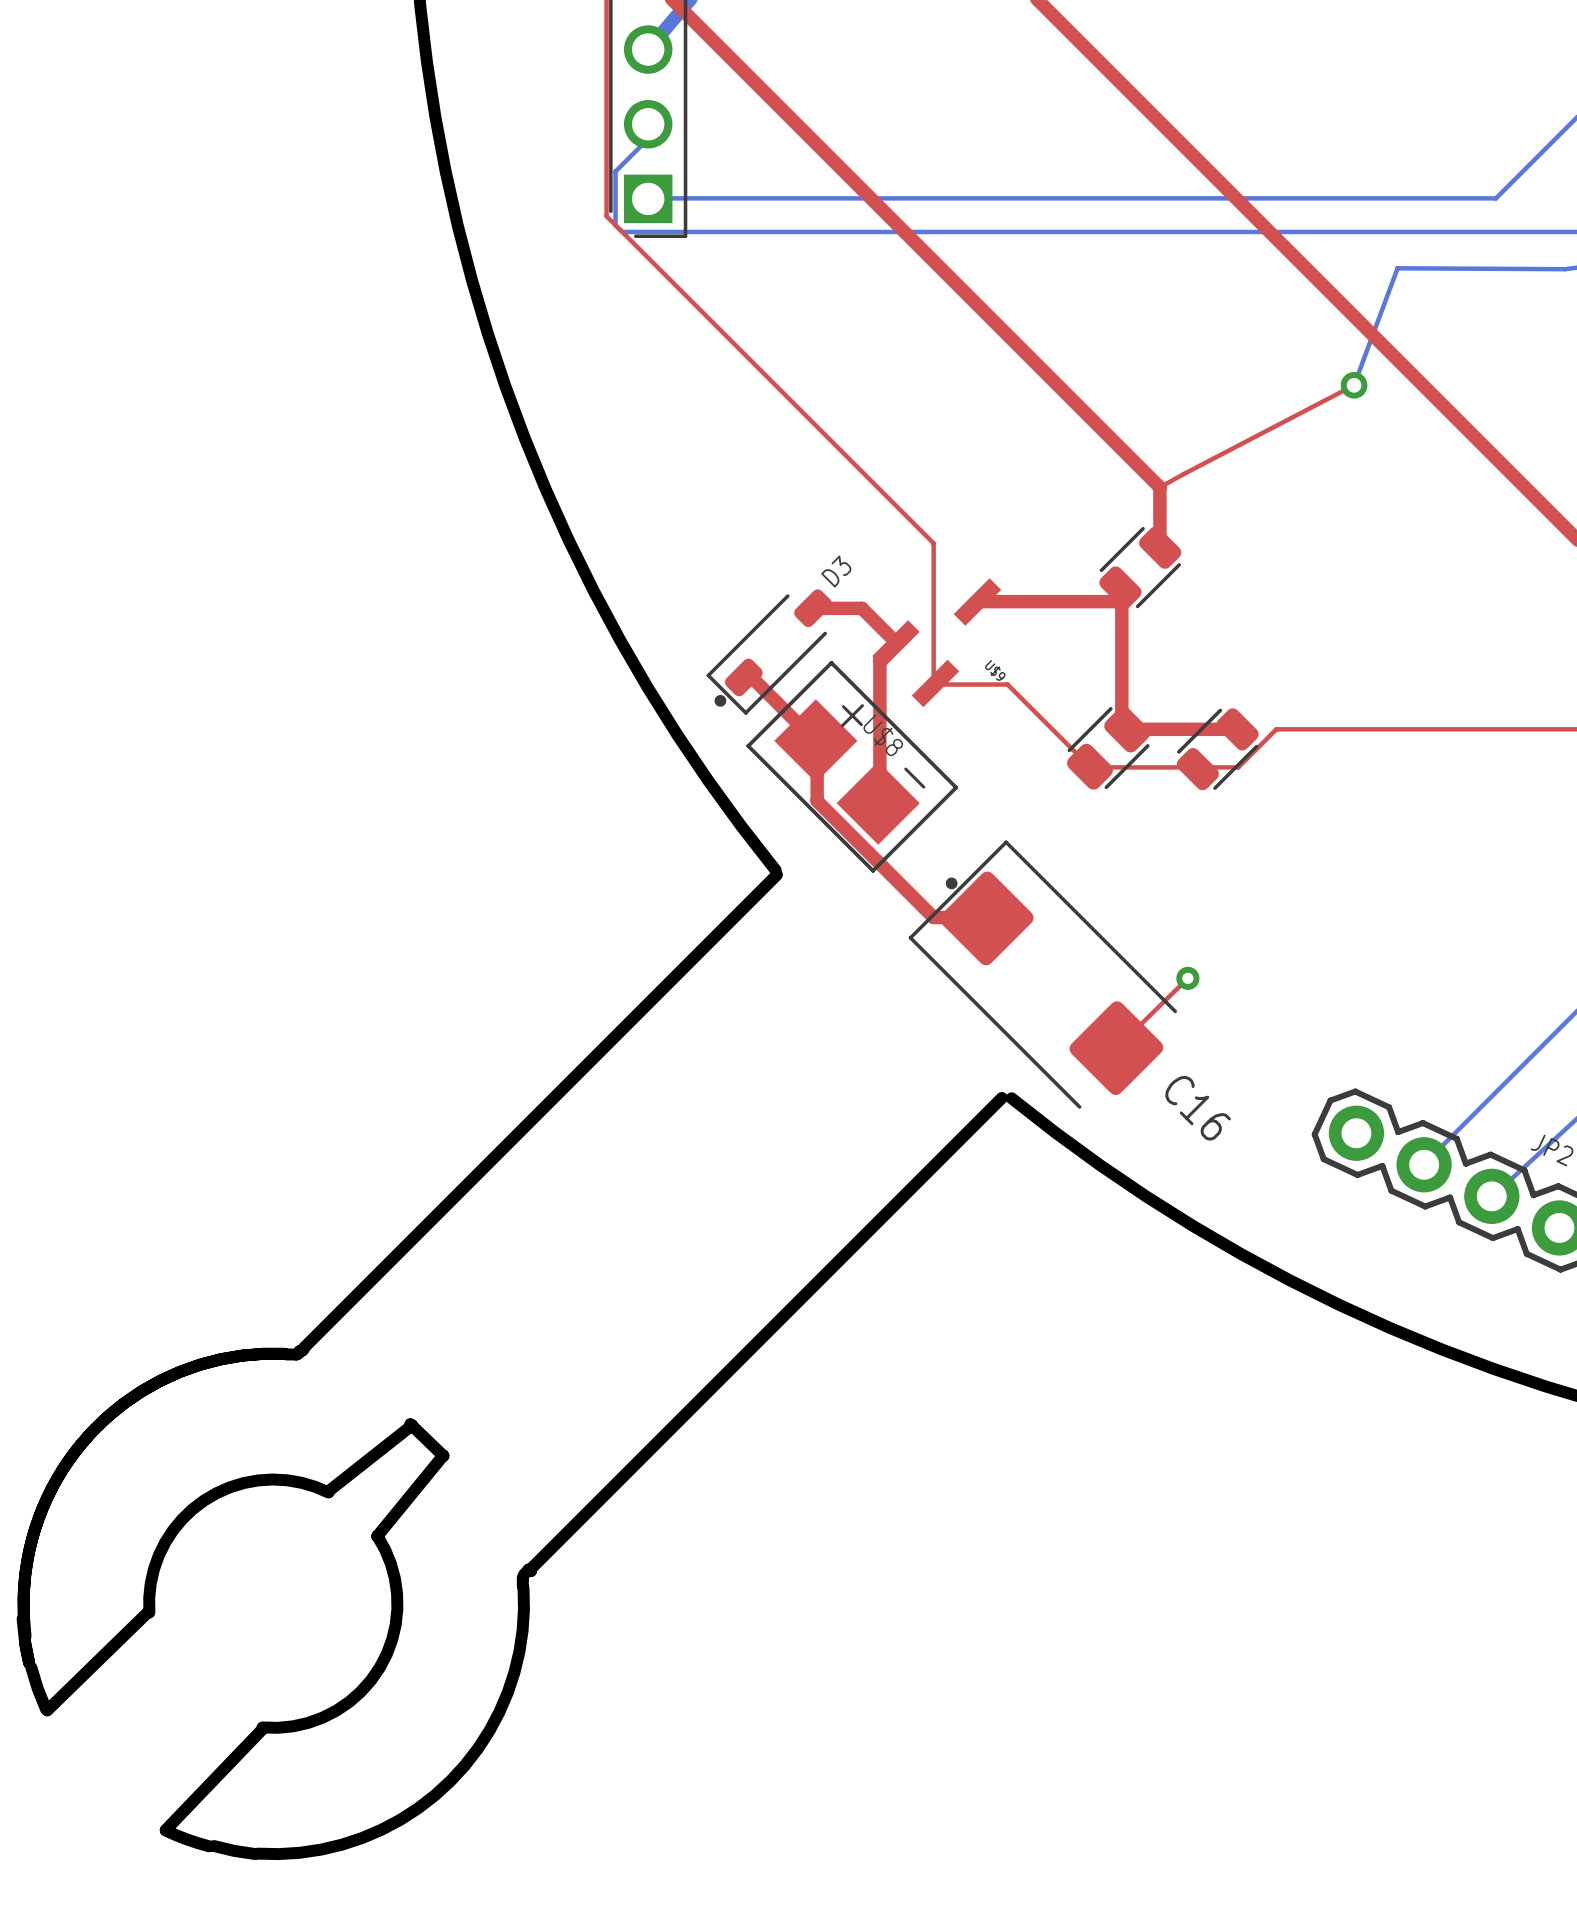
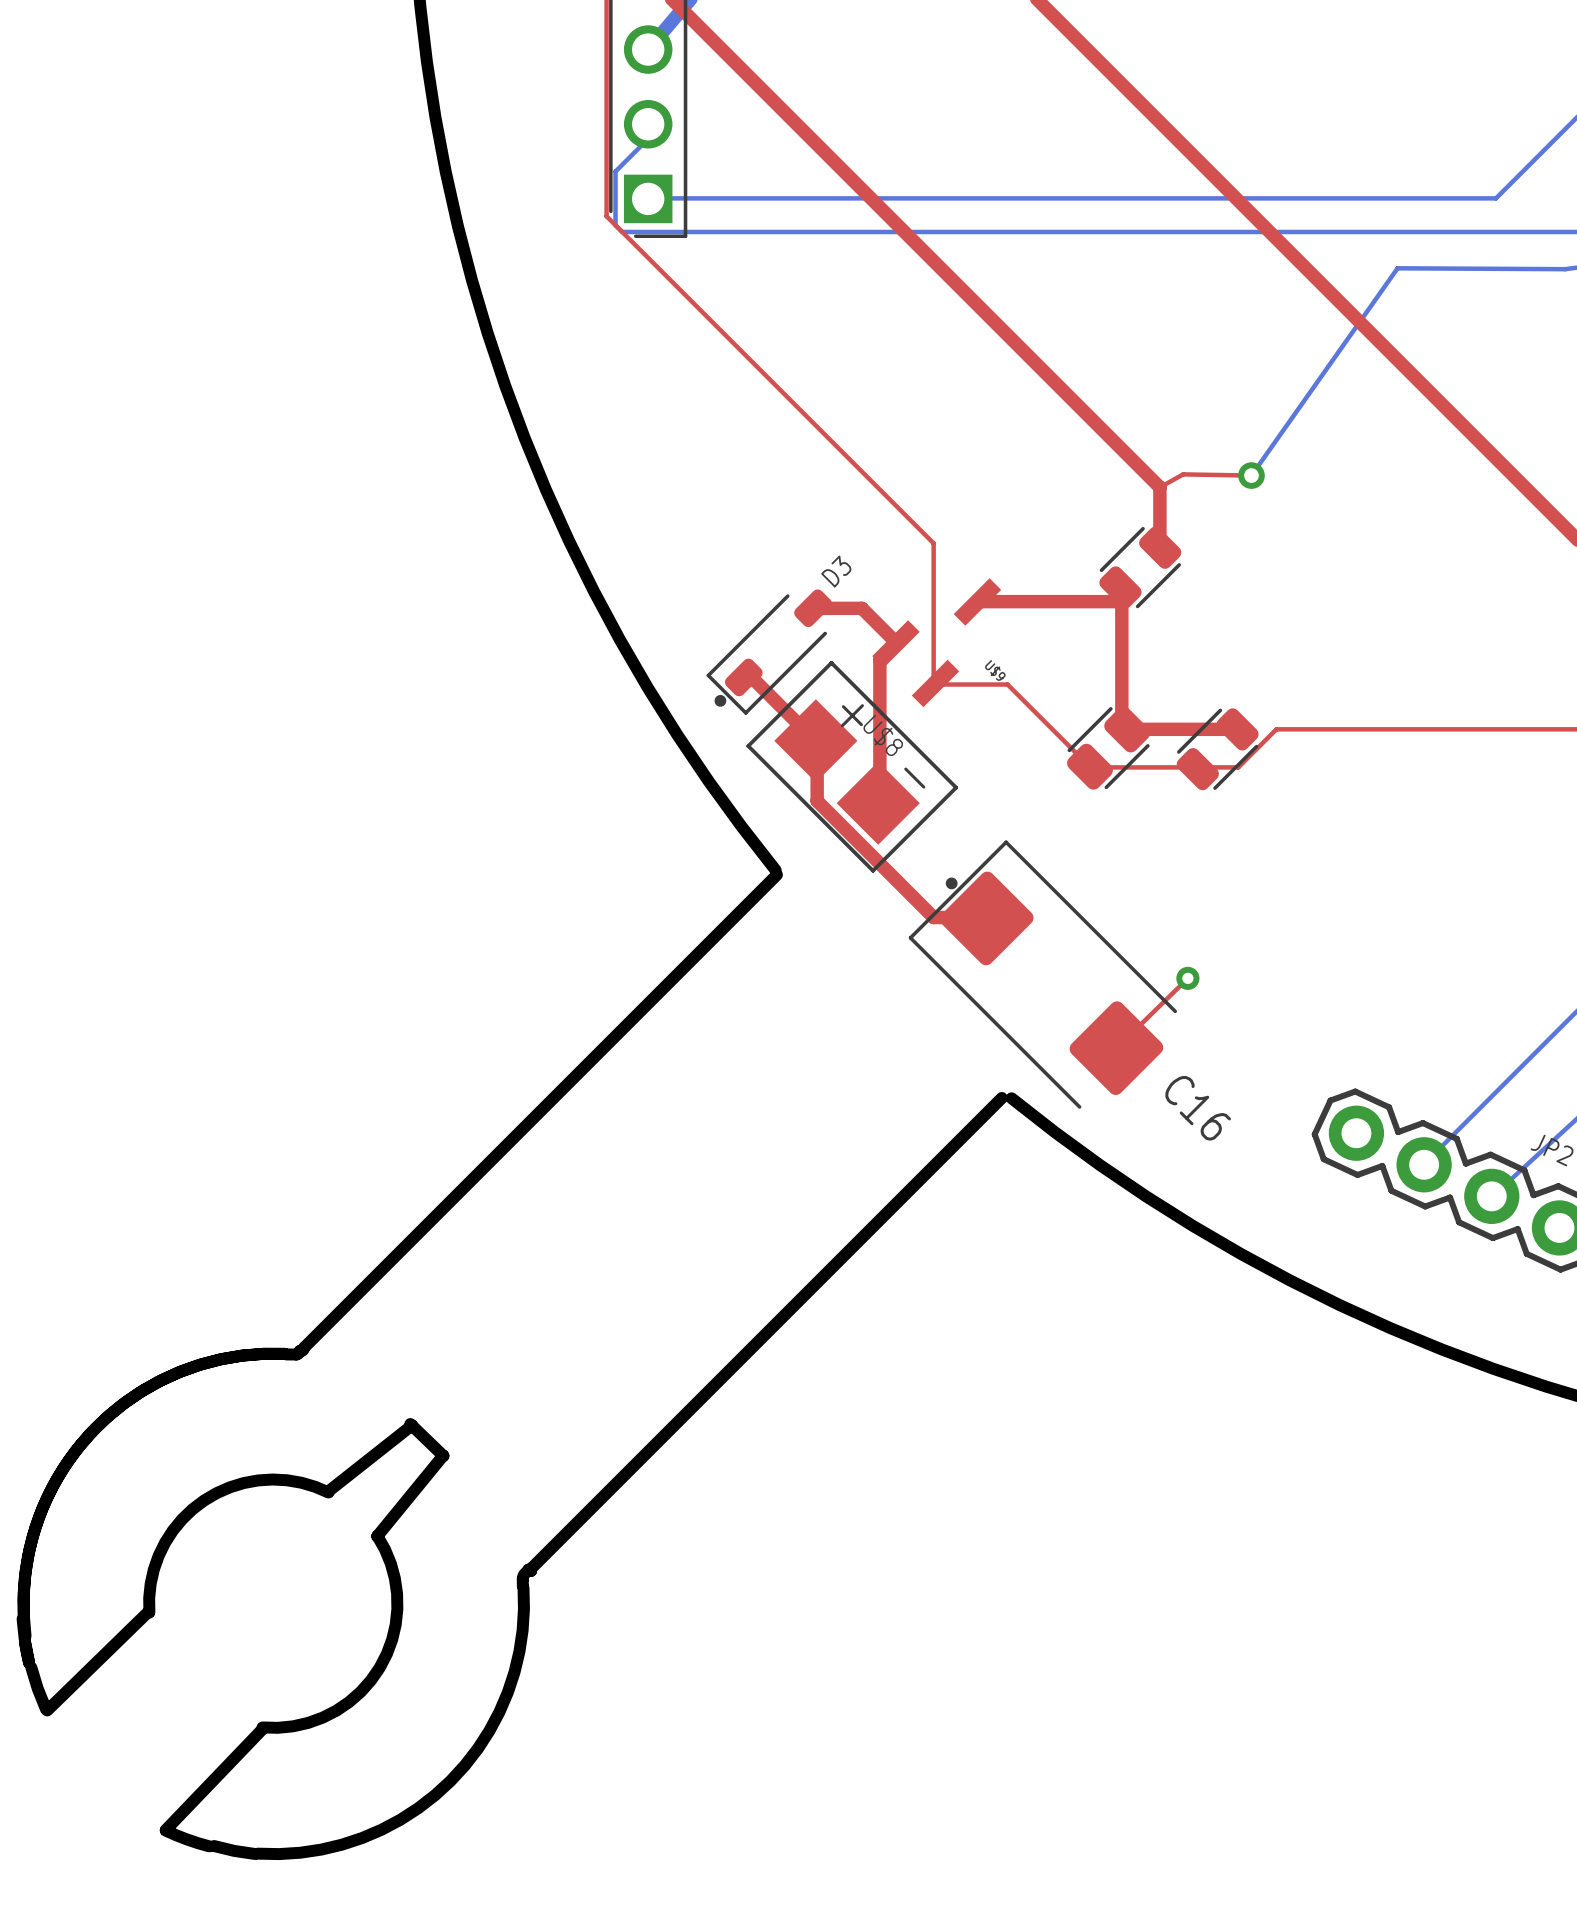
bottom track: (1397, 268) (1354, 385) -> (1397, 268) (1251, 475)
top track: (1354, 385) (1183, 474) -> (1251, 475) (1183, 474)
via position: (1354, 385) -> (1251, 475)

